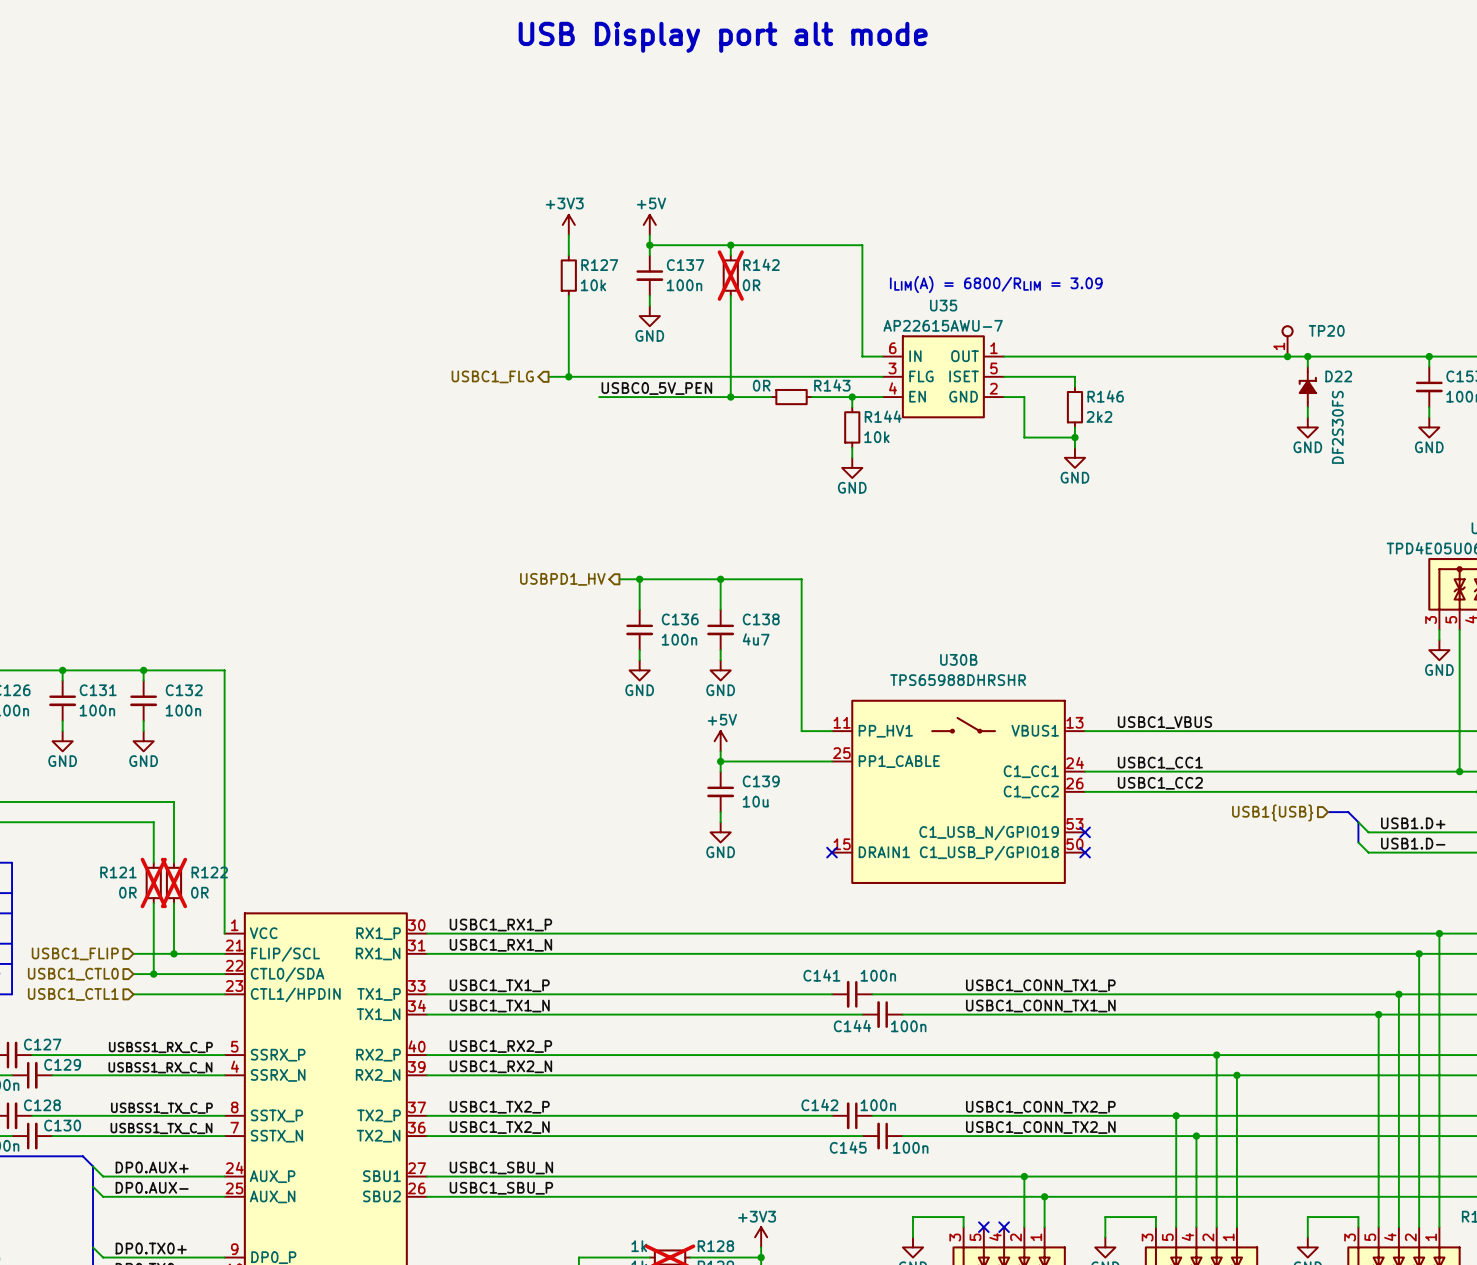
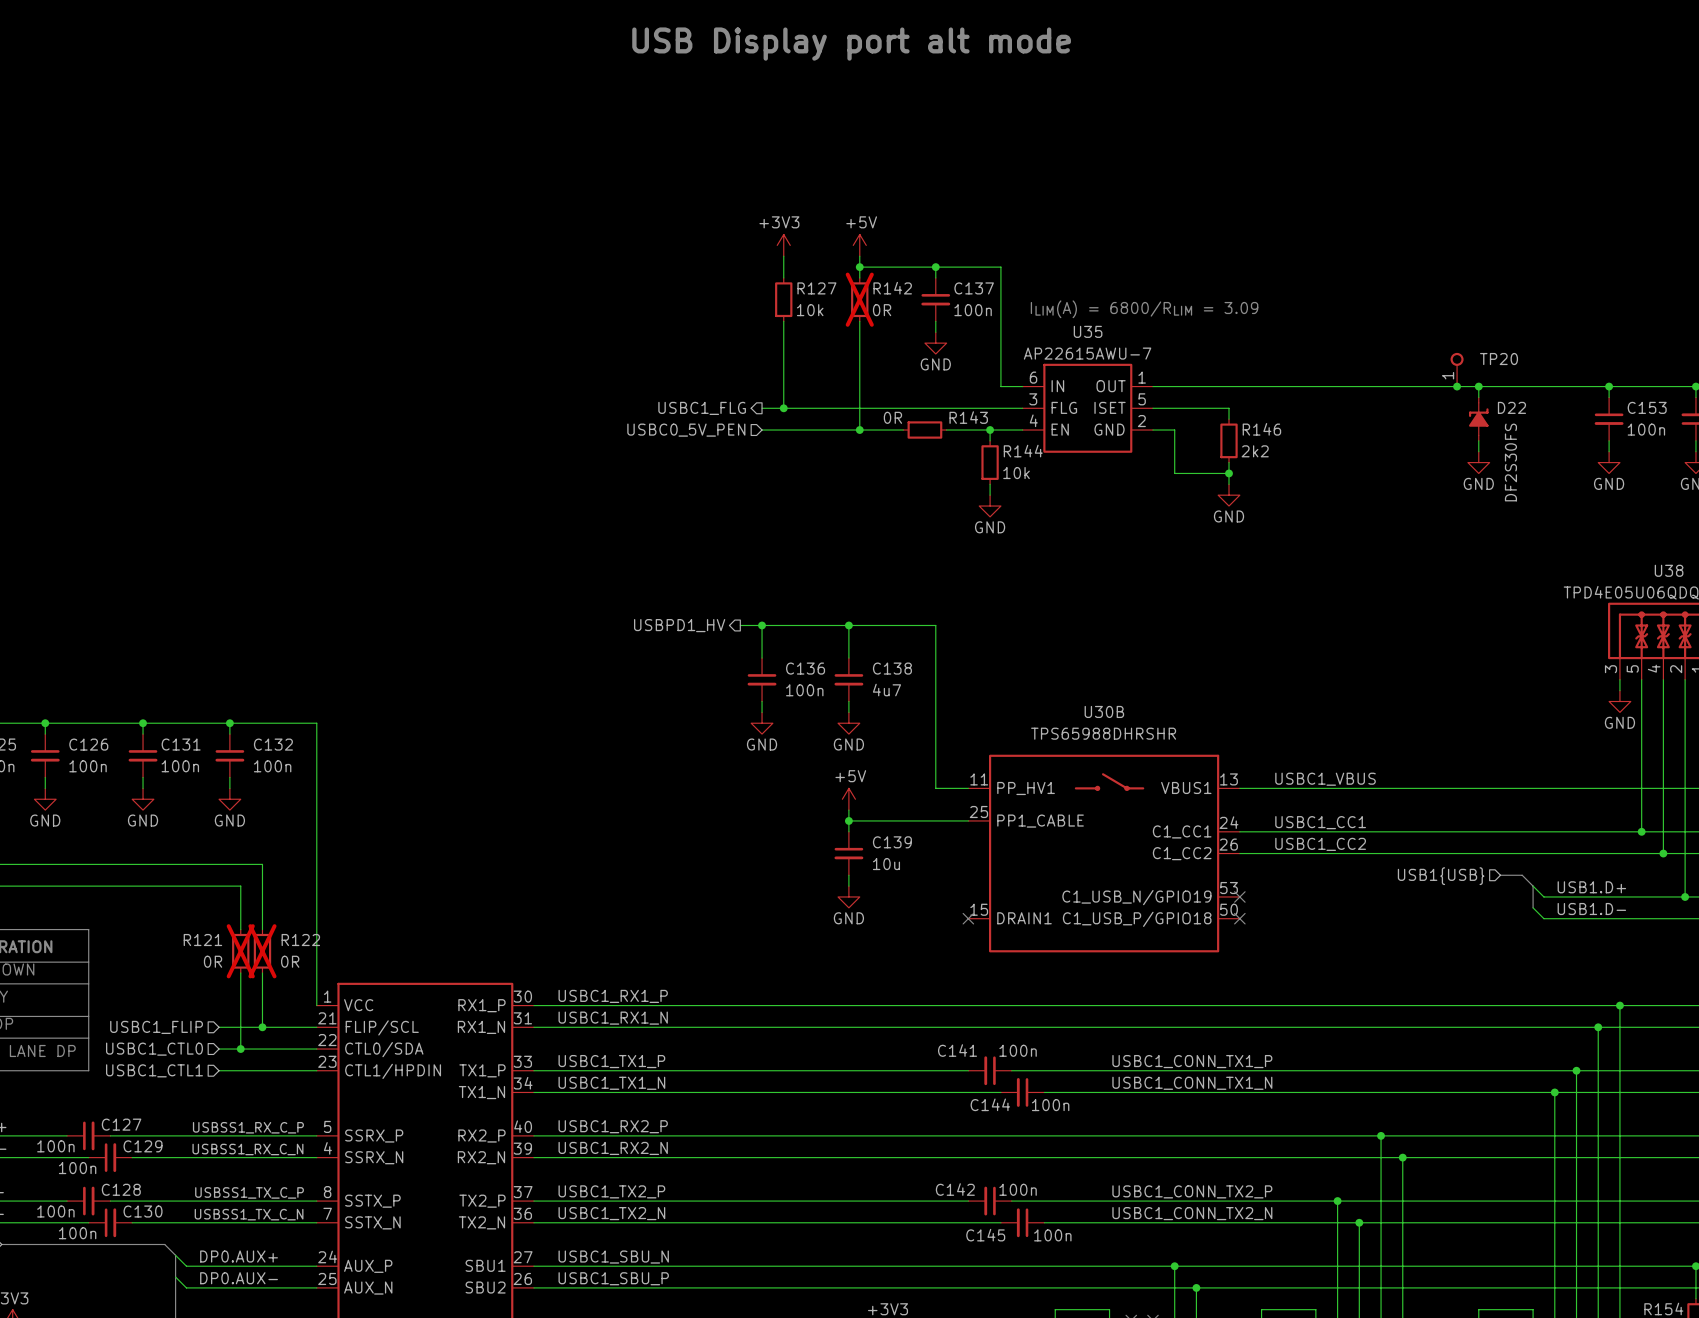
power symbol position: +3V3 (568, 224) -> +3V3 (783, 245)
power symbol position: +5V (649, 224) -> +5V (859, 245)
wire: (568, 235) (568, 255) -> (783, 256) (783, 277)
wire: (649, 235) (649, 255) -> none
wire: (649, 245) (730, 245) -> (859, 256) (859, 267)
junction: (649, 245) -> none
wire: none -> (935, 267) (935, 277)
junction: none -> (935, 267)
R127 position: (568, 275) -> (783, 299)
C137 position: (649, 275) -> (935, 299)
wire: (568, 295) (568, 376) -> (783, 321) (783, 408)
wire: (649, 295) (649, 305) -> (935, 321) (935, 332)
power symbol position: GND (649, 316) -> GND (935, 343)
hierarchical label position: USBC1_FLG (492, 376) -> USBC1_FLG (702, 408)
wire: (548, 376) (639, 376) -> none
junction: (568, 376) -> none
junction: none -> (783, 408)
label: USBC0_5V_PEN (656, 388) -> none
hierarchical label: none -> USBC0_5V_PEN (686, 430)
wire: (599, 397) (639, 397) -> none

